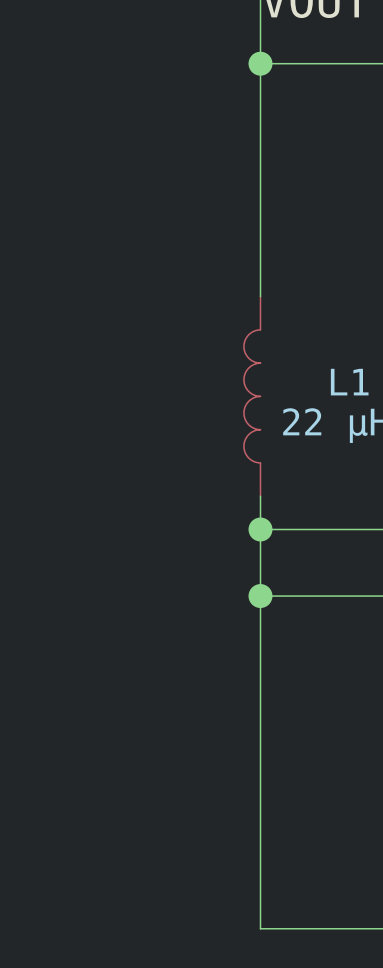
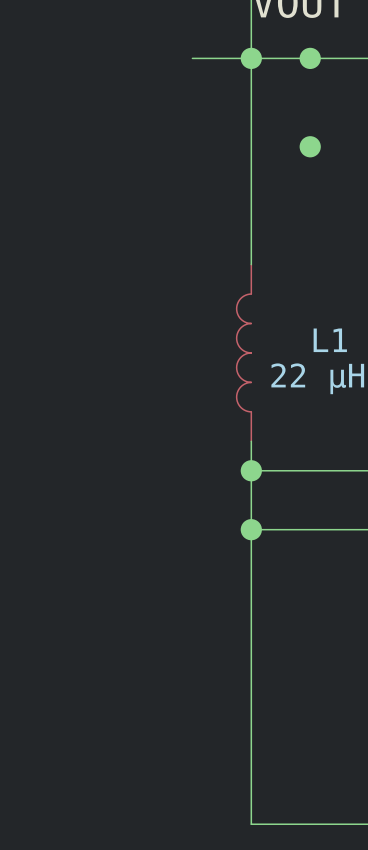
wire: none -> (192, 58) (251, 58)
junction: none -> (310, 58)
junction: none -> (310, 146)

